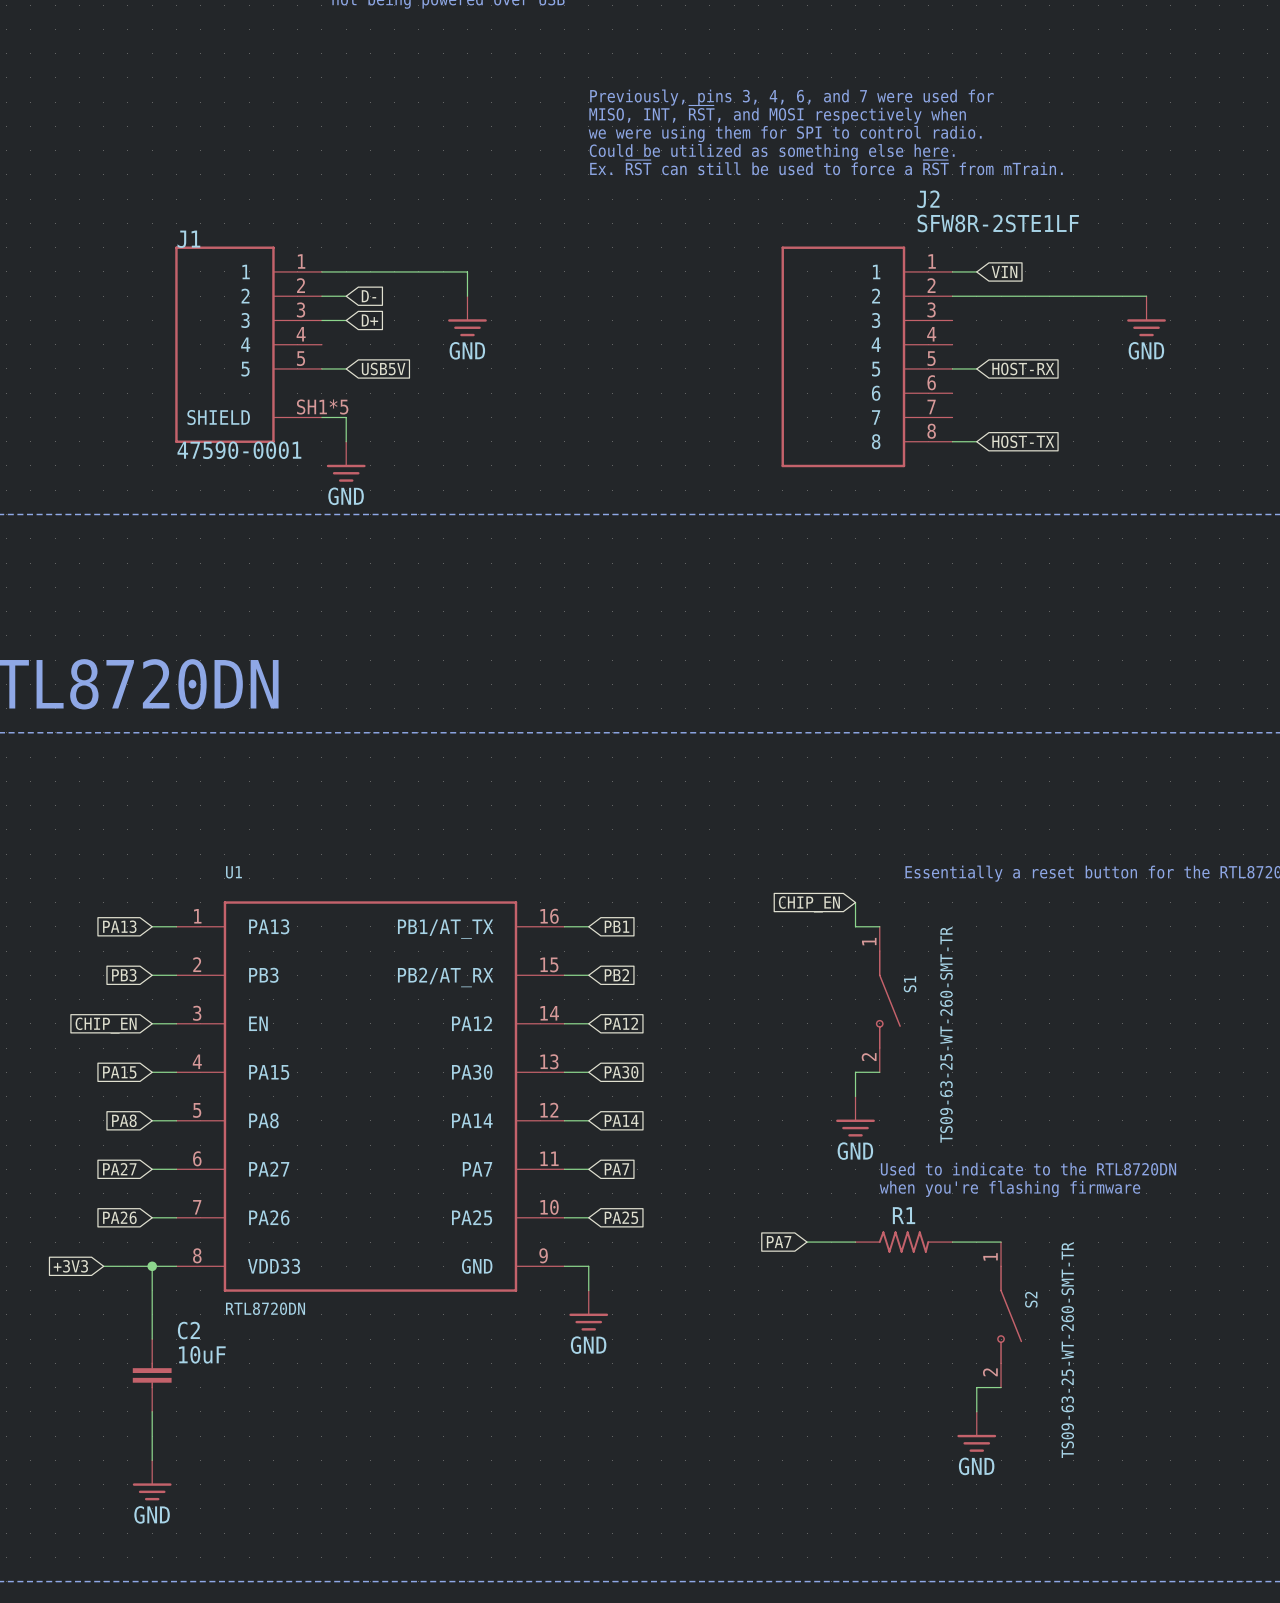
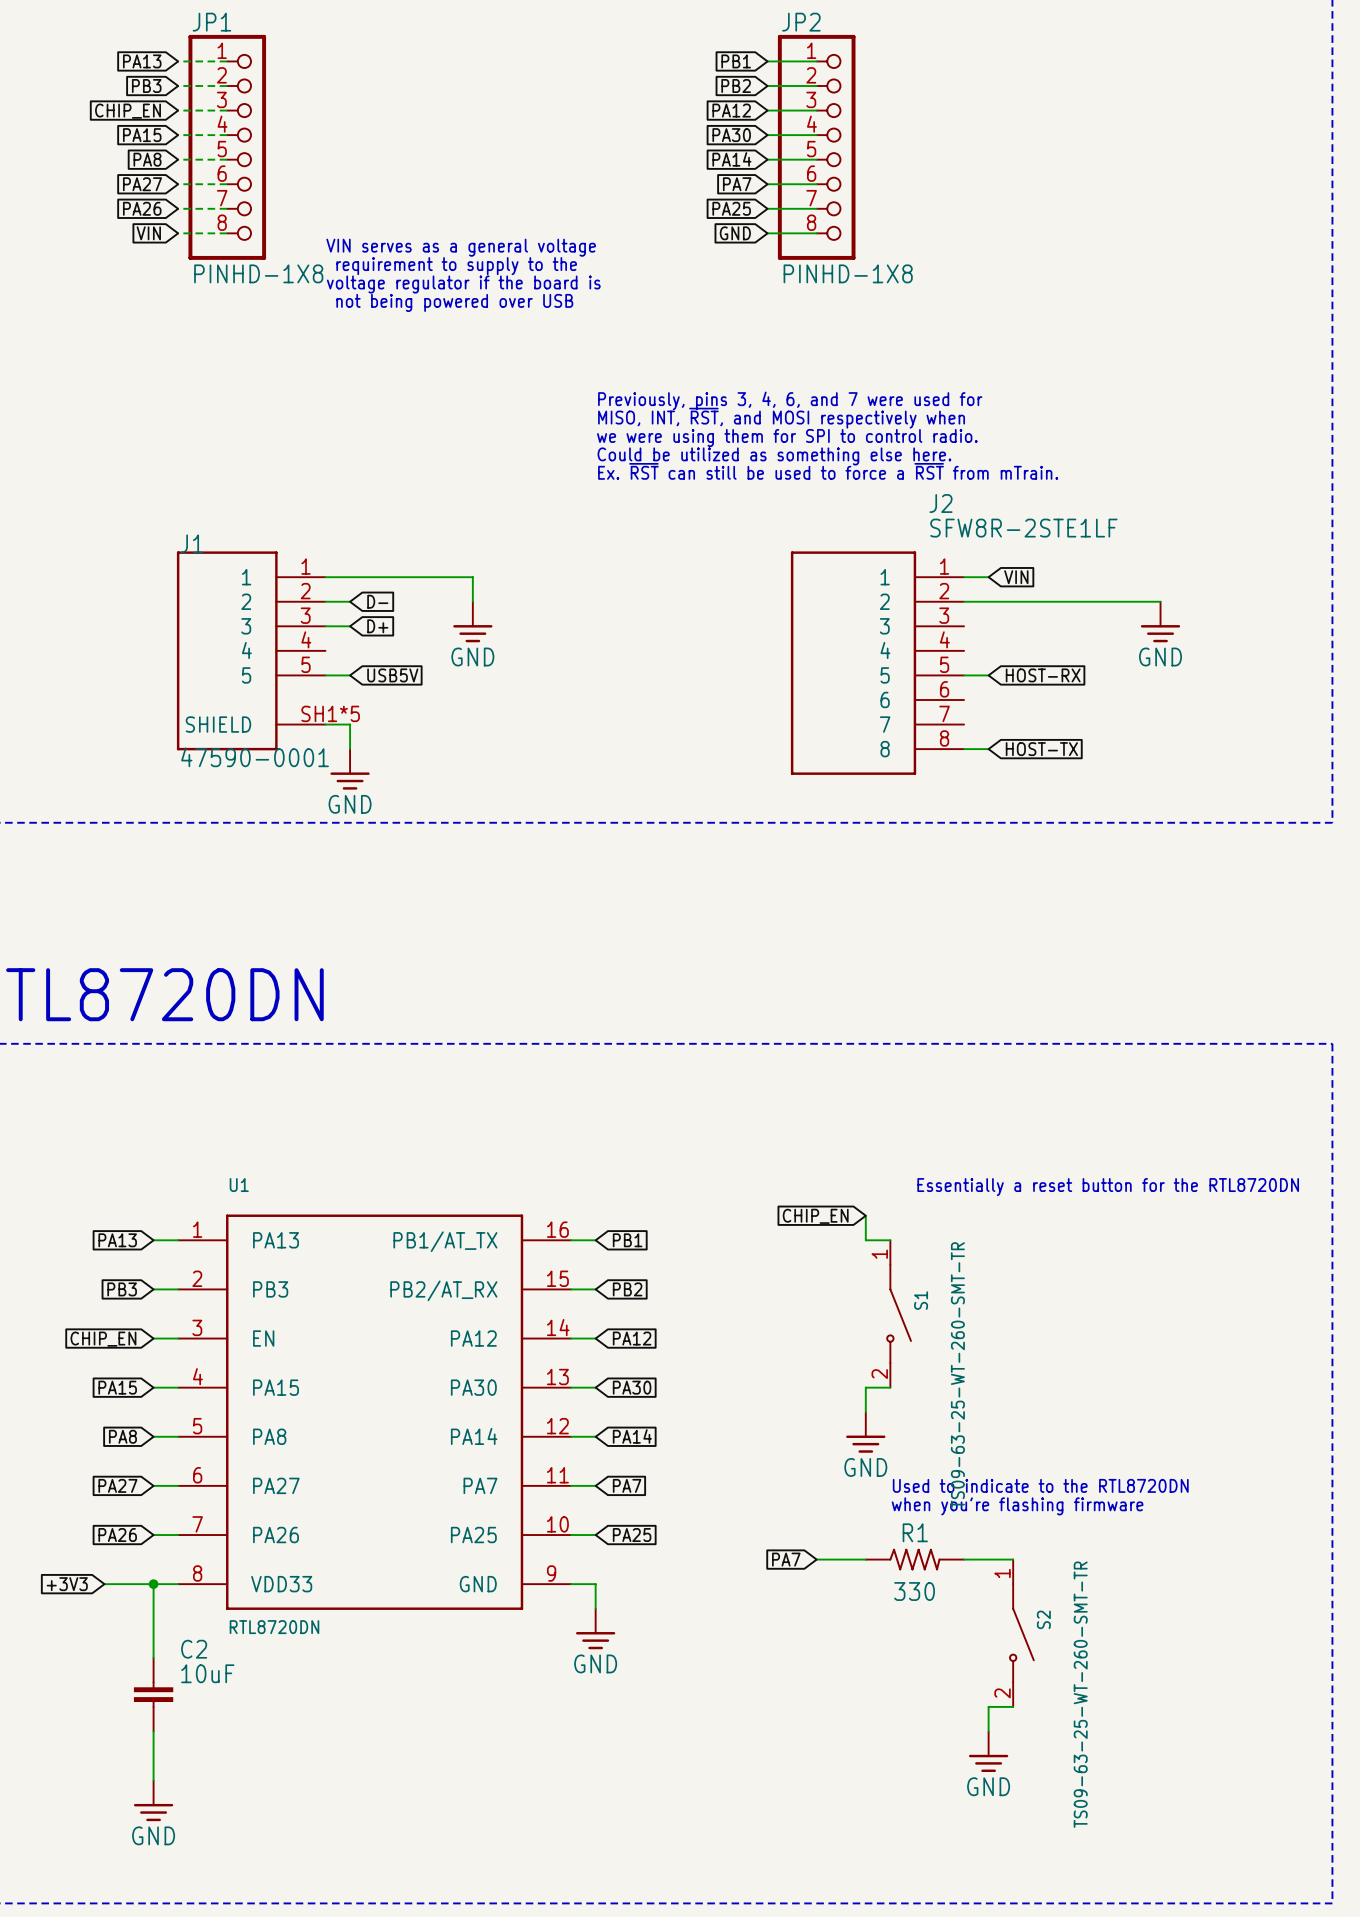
R1 value: none -> 330 (914, 1591)

